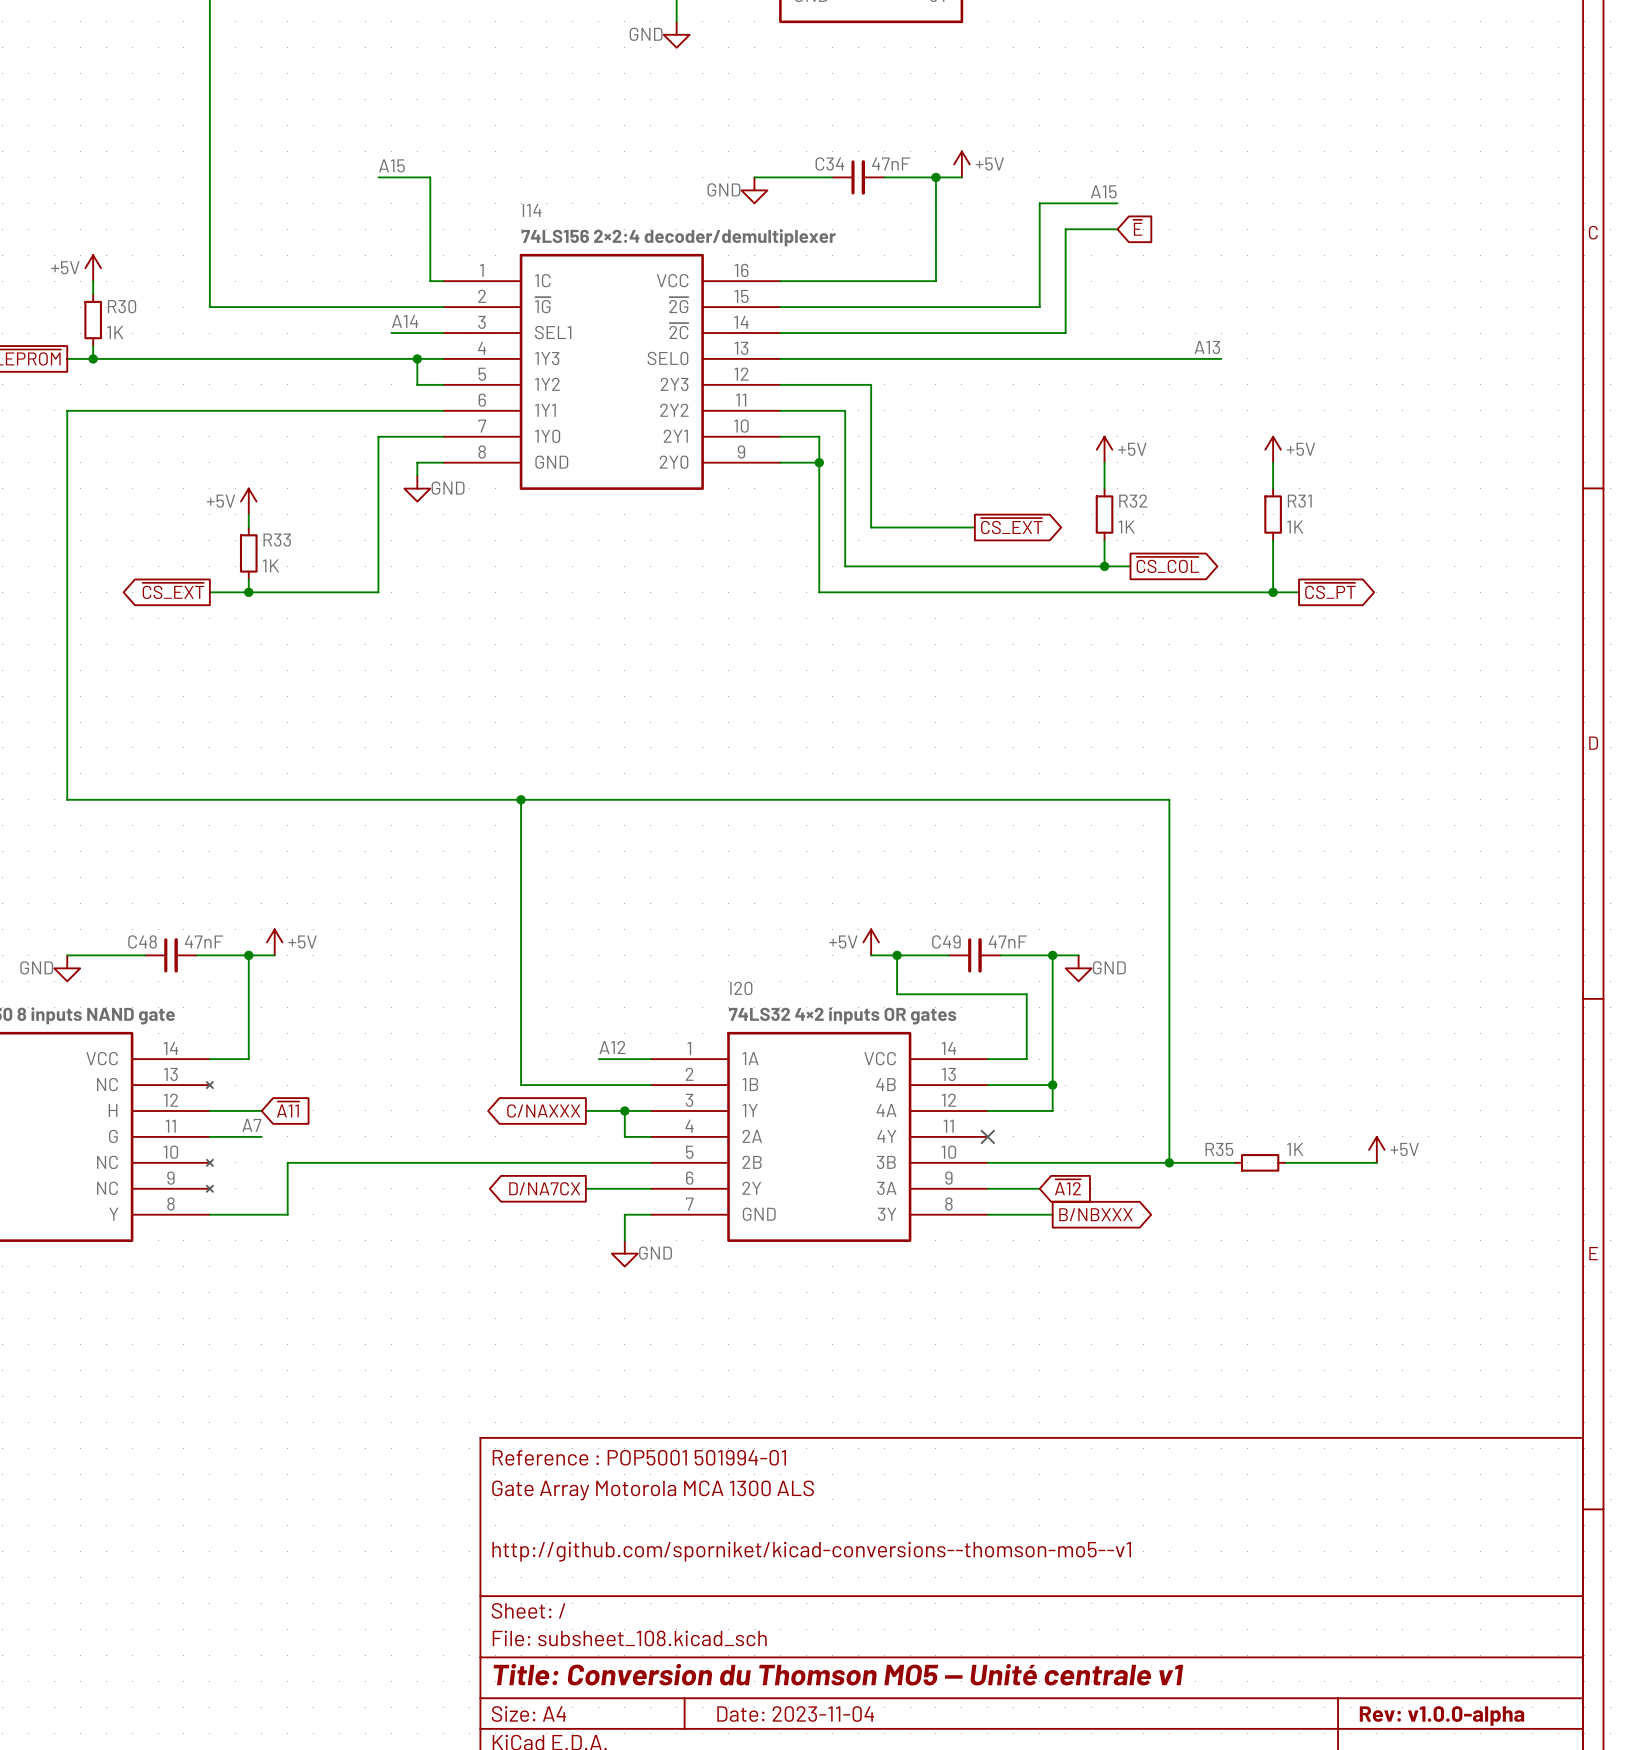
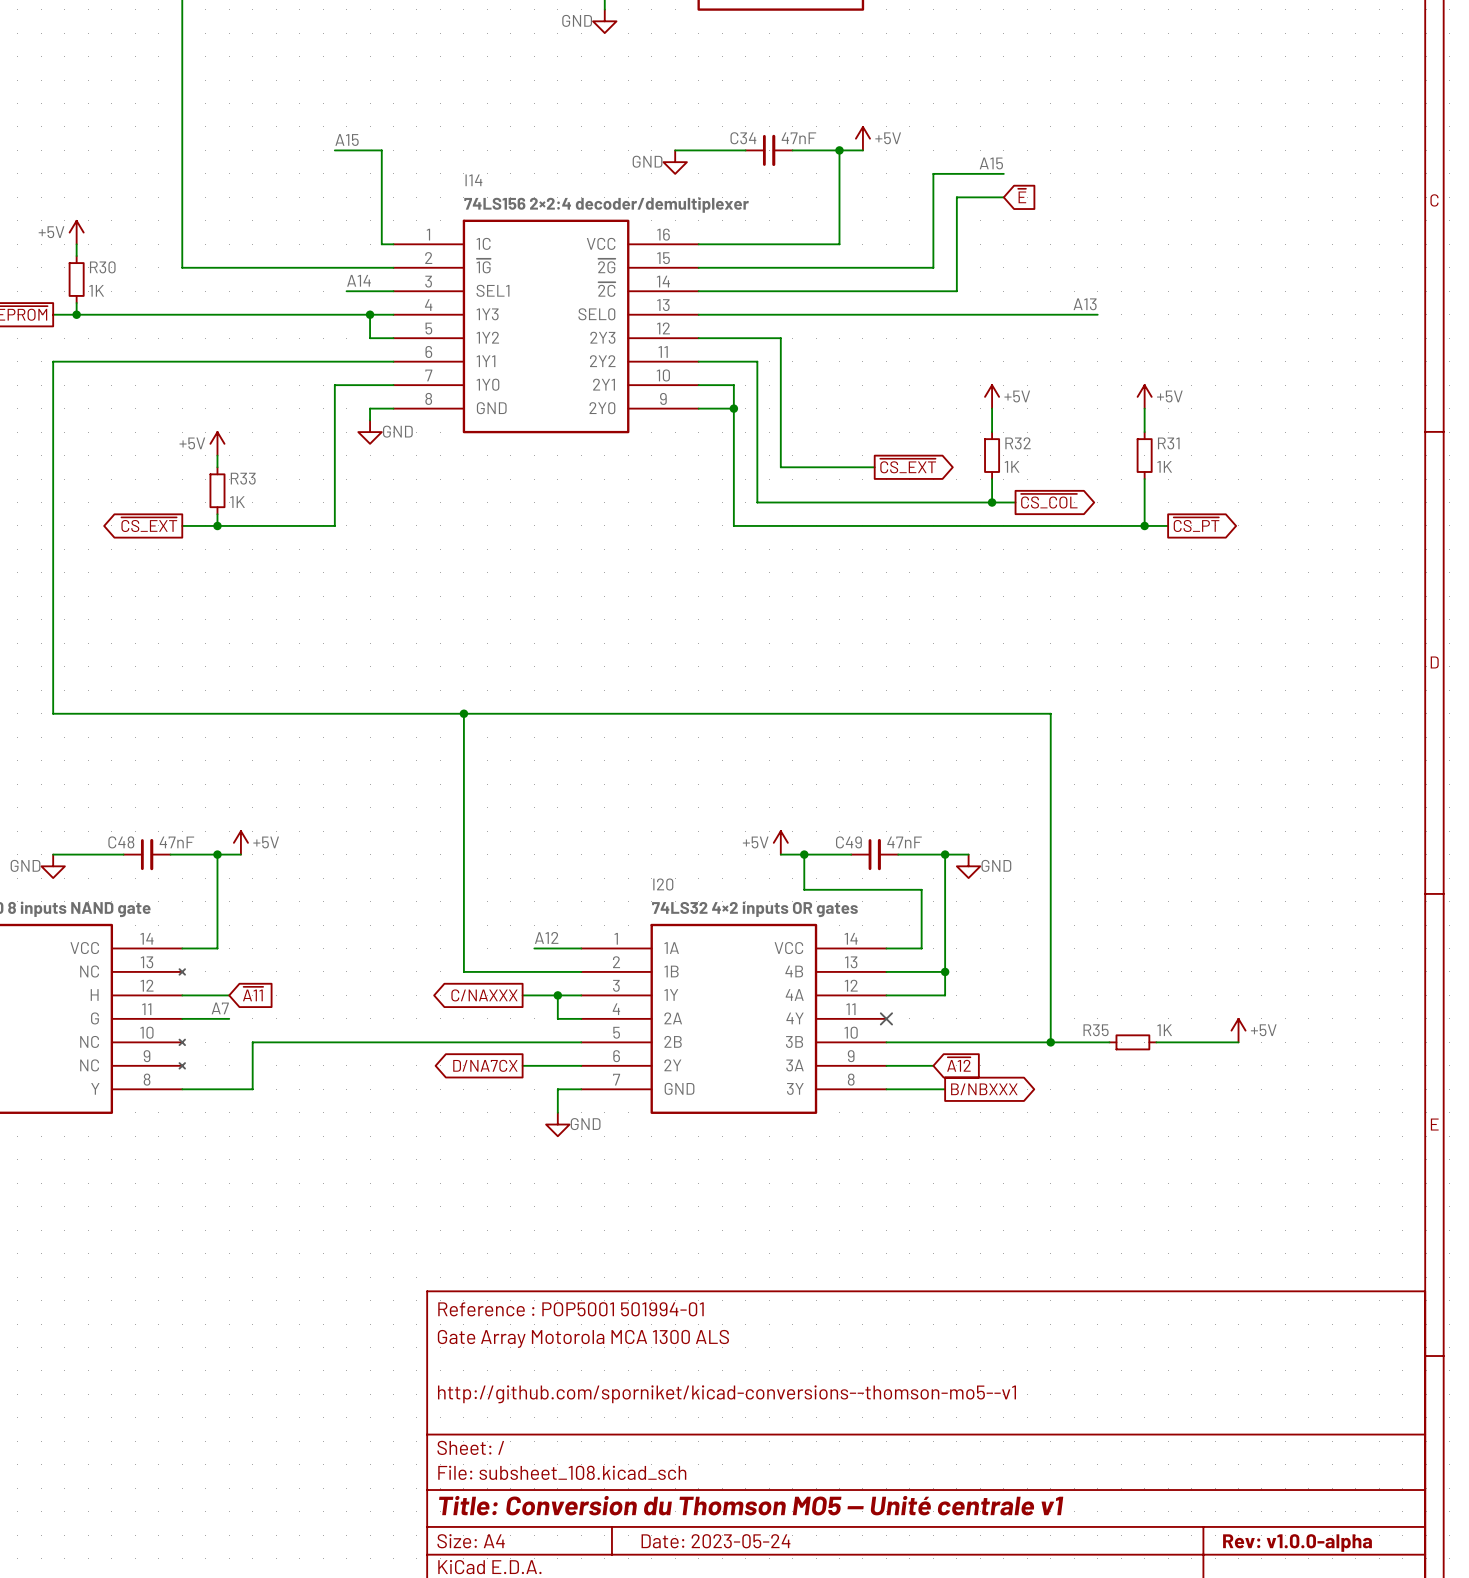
title block: Date: 2023-11-04 (795, 1714) -> Date: 2023-05-24 (715, 1541)

